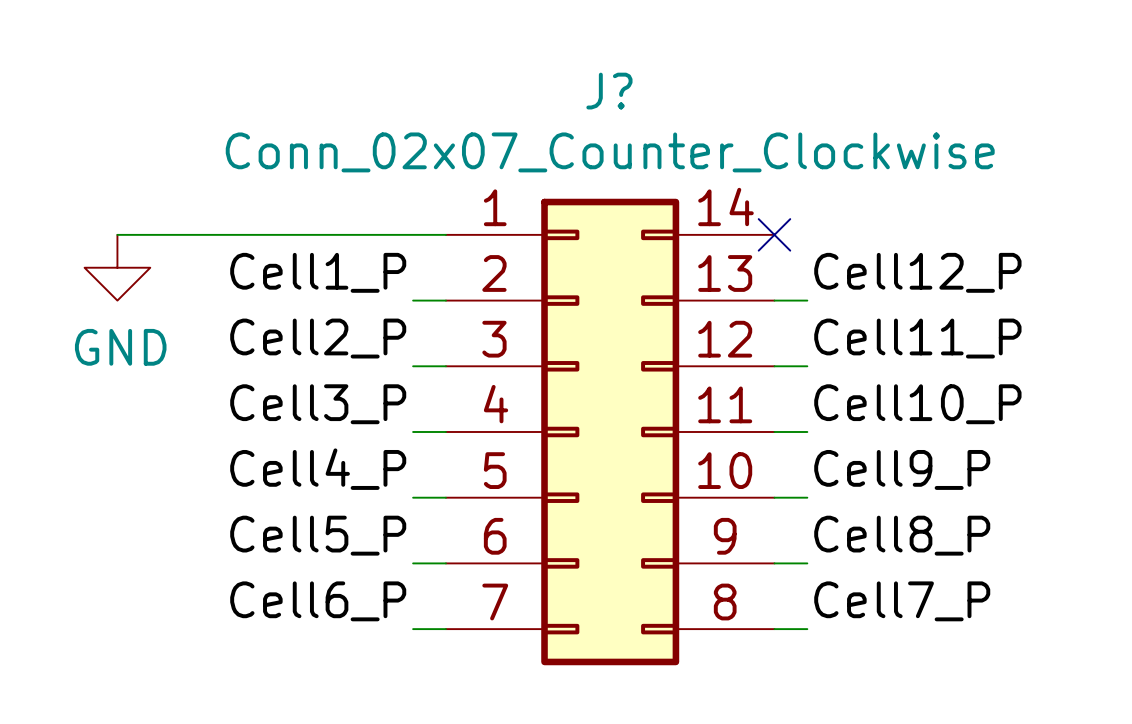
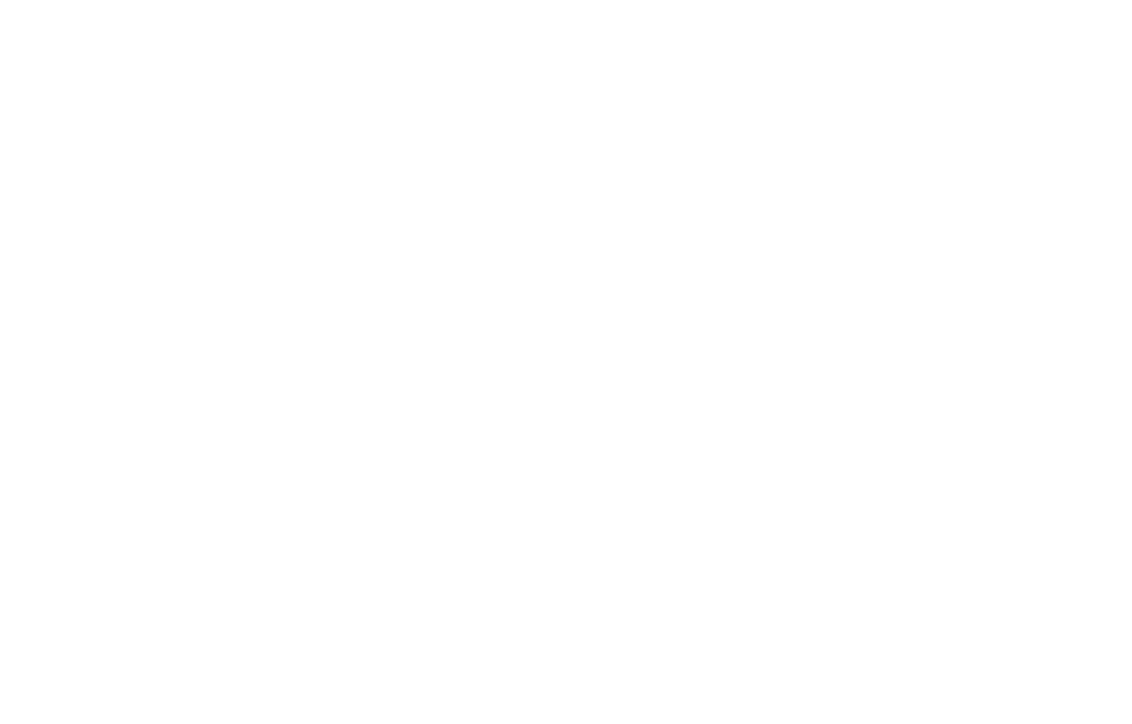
wire: (117, 234) (445, 234) -> none
no-connect mark: (774, 234) -> none
power symbol: GND (117, 267) -> none
label: Cell1_P (318, 272) -> none
label: Cell12_P (917, 272) -> none
wire: (413, 300) (445, 300) -> none
wire: (774, 300) (807, 300) -> none
label: Cell2_P (318, 338) -> none
label: Cell11_P (917, 338) -> none
wire: (413, 366) (445, 366) -> none
wire: (774, 366) (807, 366) -> none
label: Cell3_P (318, 404) -> none
label: Cell10_P (917, 404) -> none
wire: (413, 431) (445, 431) -> none
J?: Conn_02x07_Counter_Clockwise (610, 431) -> none
wire: (774, 431) (807, 431) -> none
label: Cell4_P (318, 469) -> none
label: Cell9_P (902, 469) -> none
wire: (413, 497) (445, 497) -> none
wire: (774, 497) (807, 497) -> none
label: Cell5_P (318, 535) -> none
label: Cell8_P (902, 535) -> none
wire: (413, 563) (445, 563) -> none
wire: (774, 563) (807, 563) -> none
label: Cell6_P (318, 601) -> none
label: Cell7_P (902, 601) -> none
wire: (413, 629) (445, 629) -> none
wire: (774, 629) (807, 629) -> none

